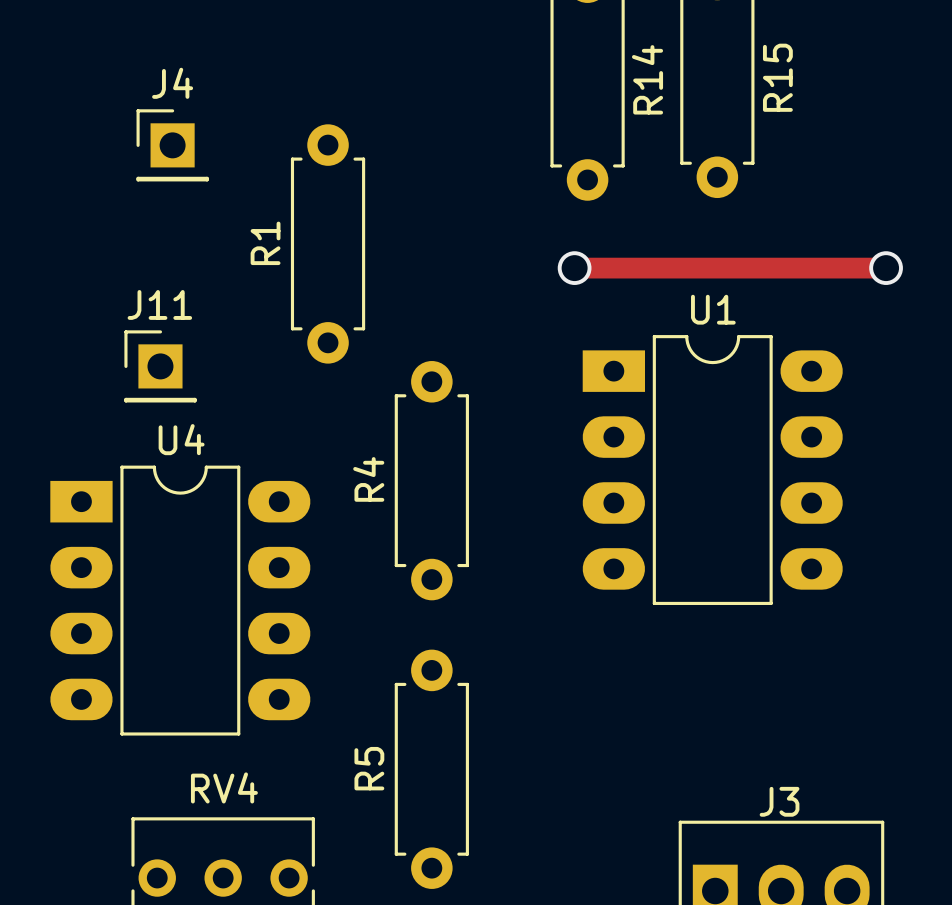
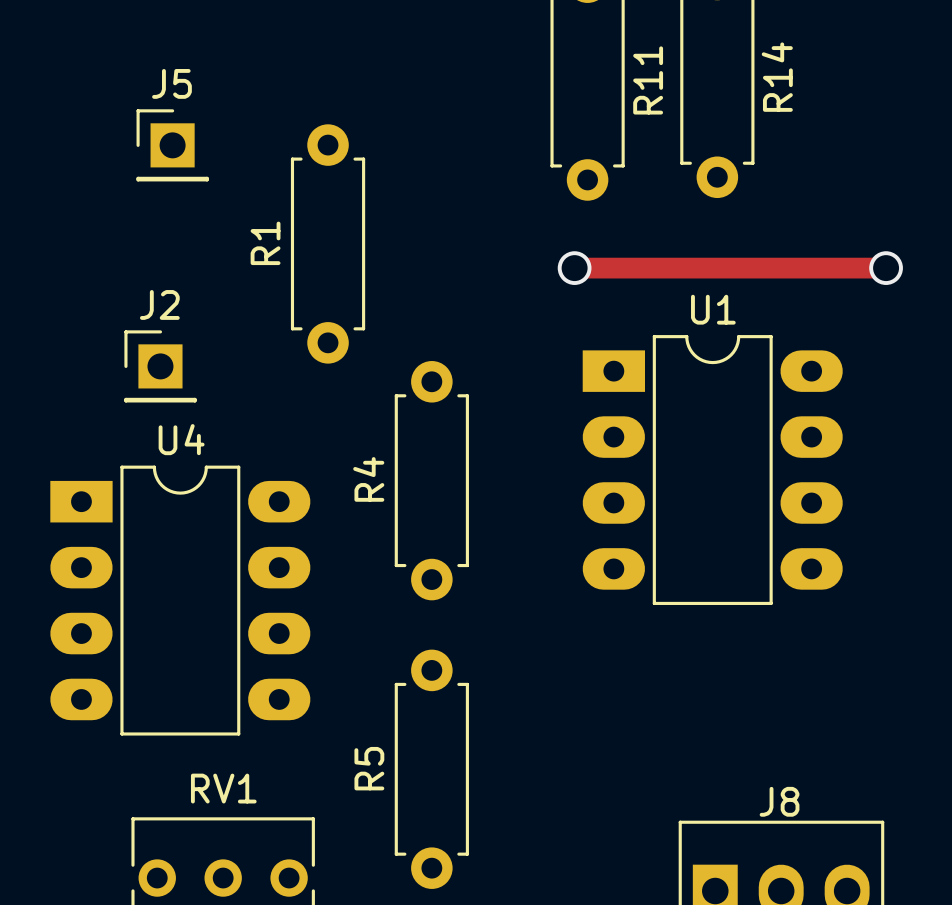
R15 name: R15 (777, 77) -> R14 (777, 77)
R14 name: R14 (647, 79) -> R11 (648, 80)
J4 name: J4 (172, 83) -> J5 (171, 83)
J11 name: J11 (159, 304) -> J2 (159, 304)
RV4 name: RV4 (224, 787) -> RV1 (223, 788)
J3 name: J3 (779, 801) -> J8 (779, 801)

